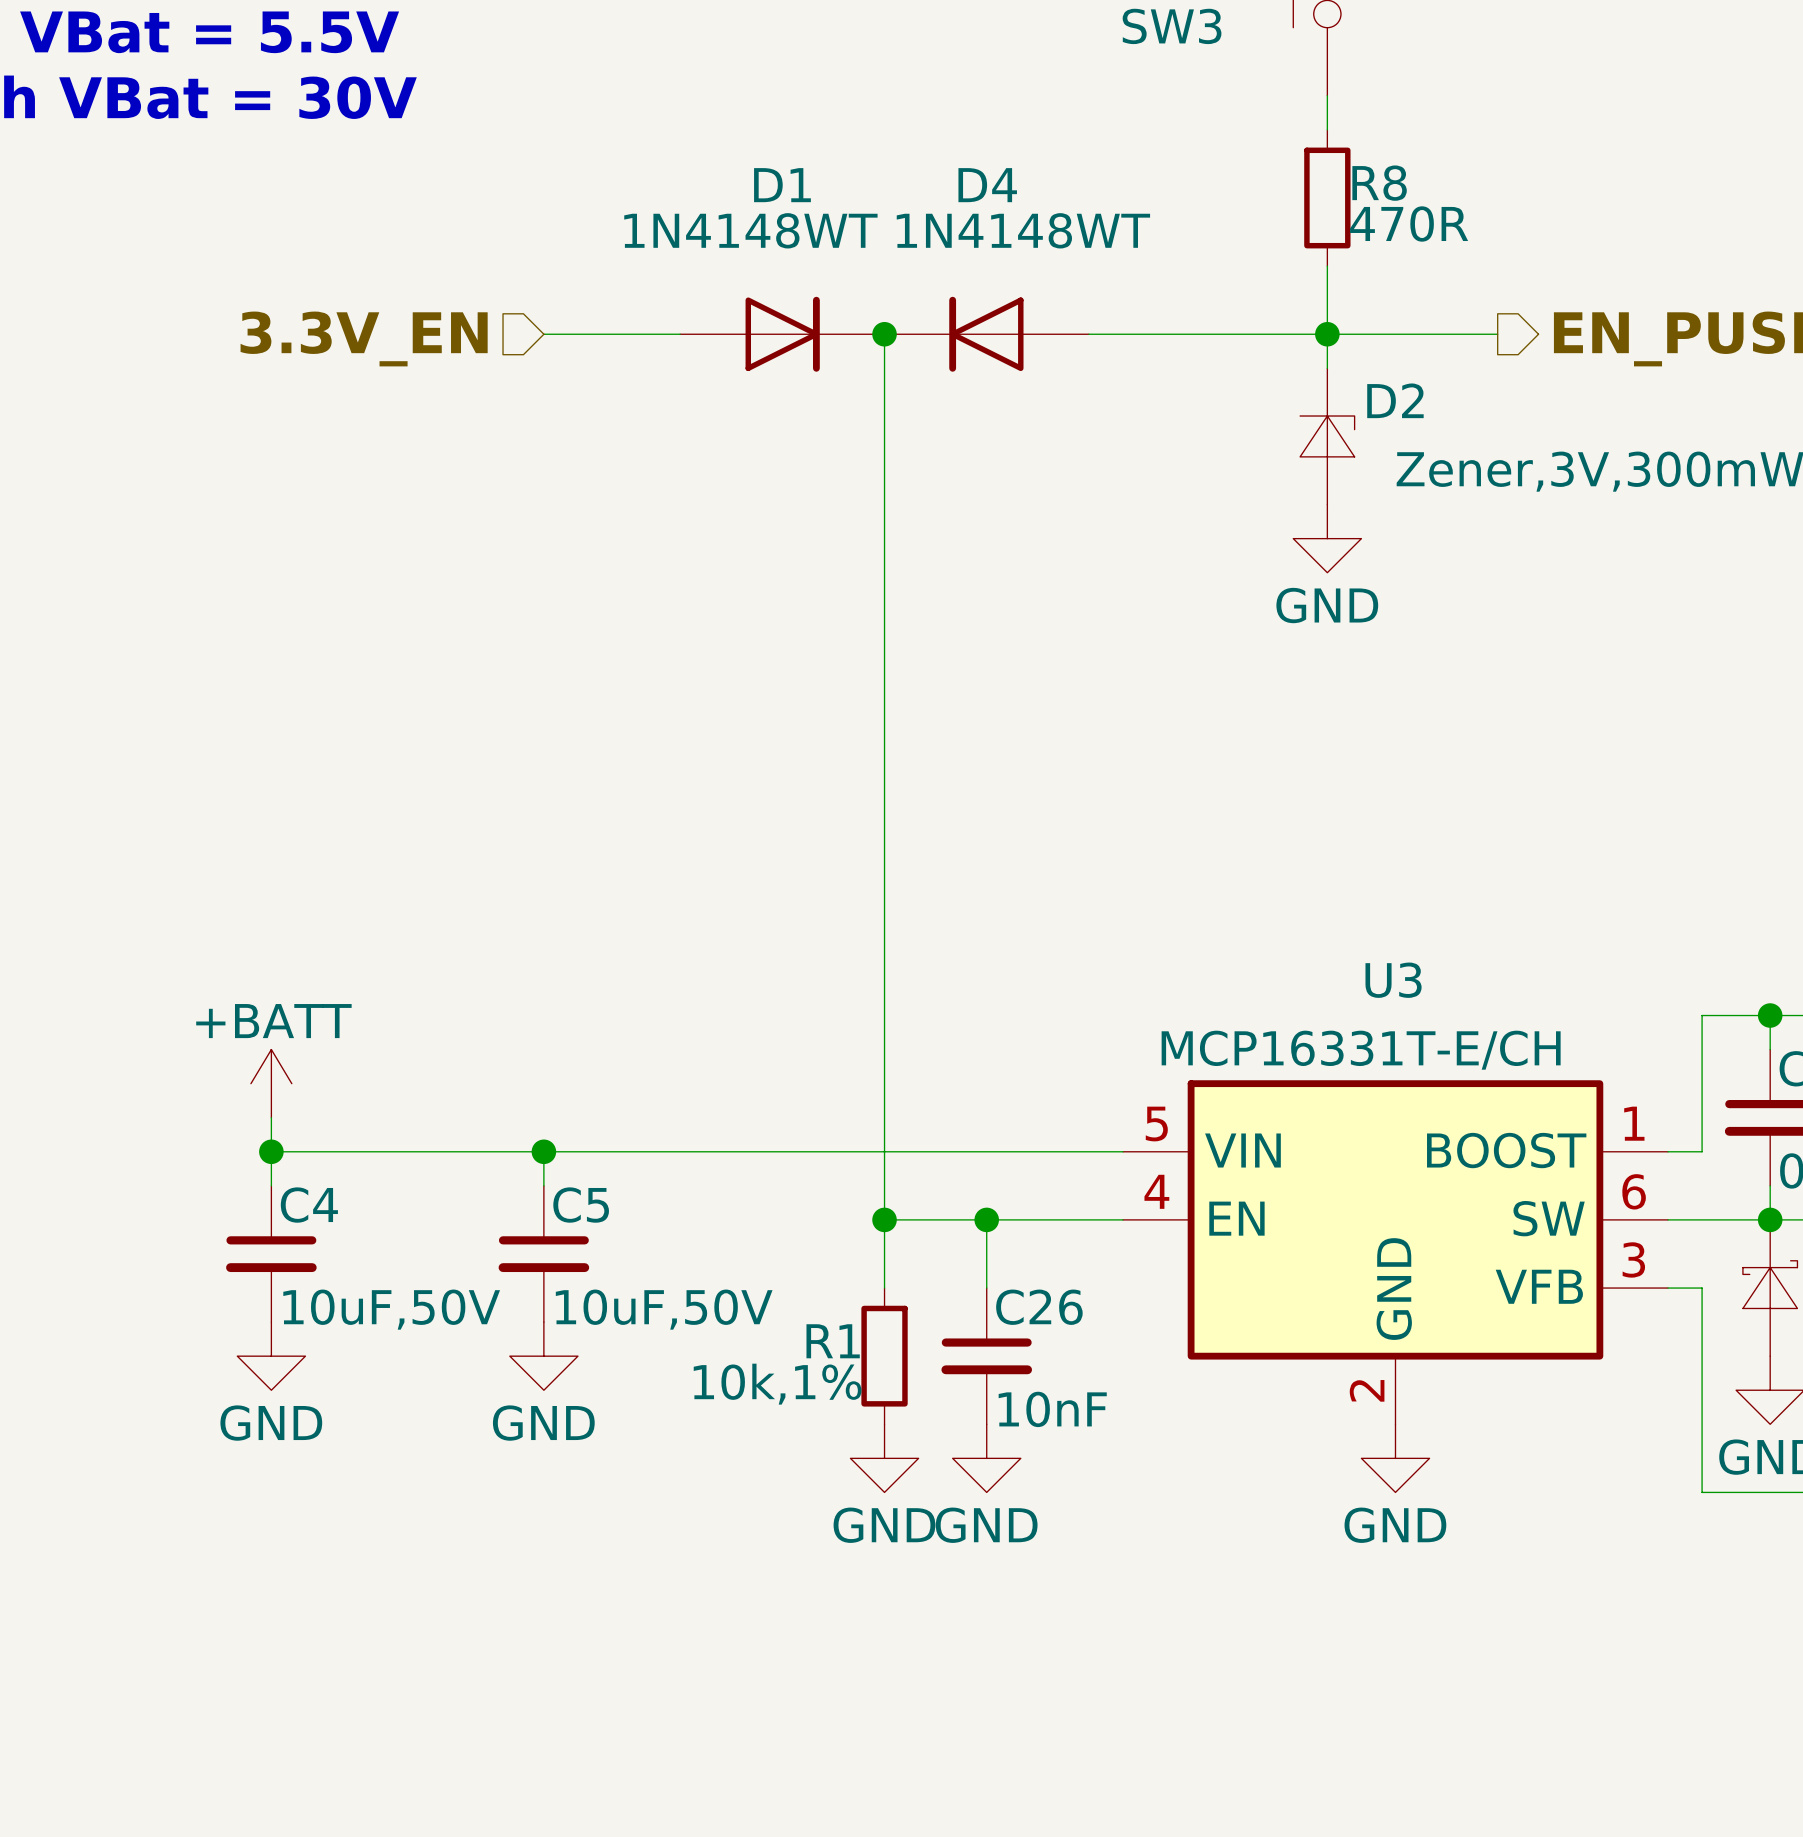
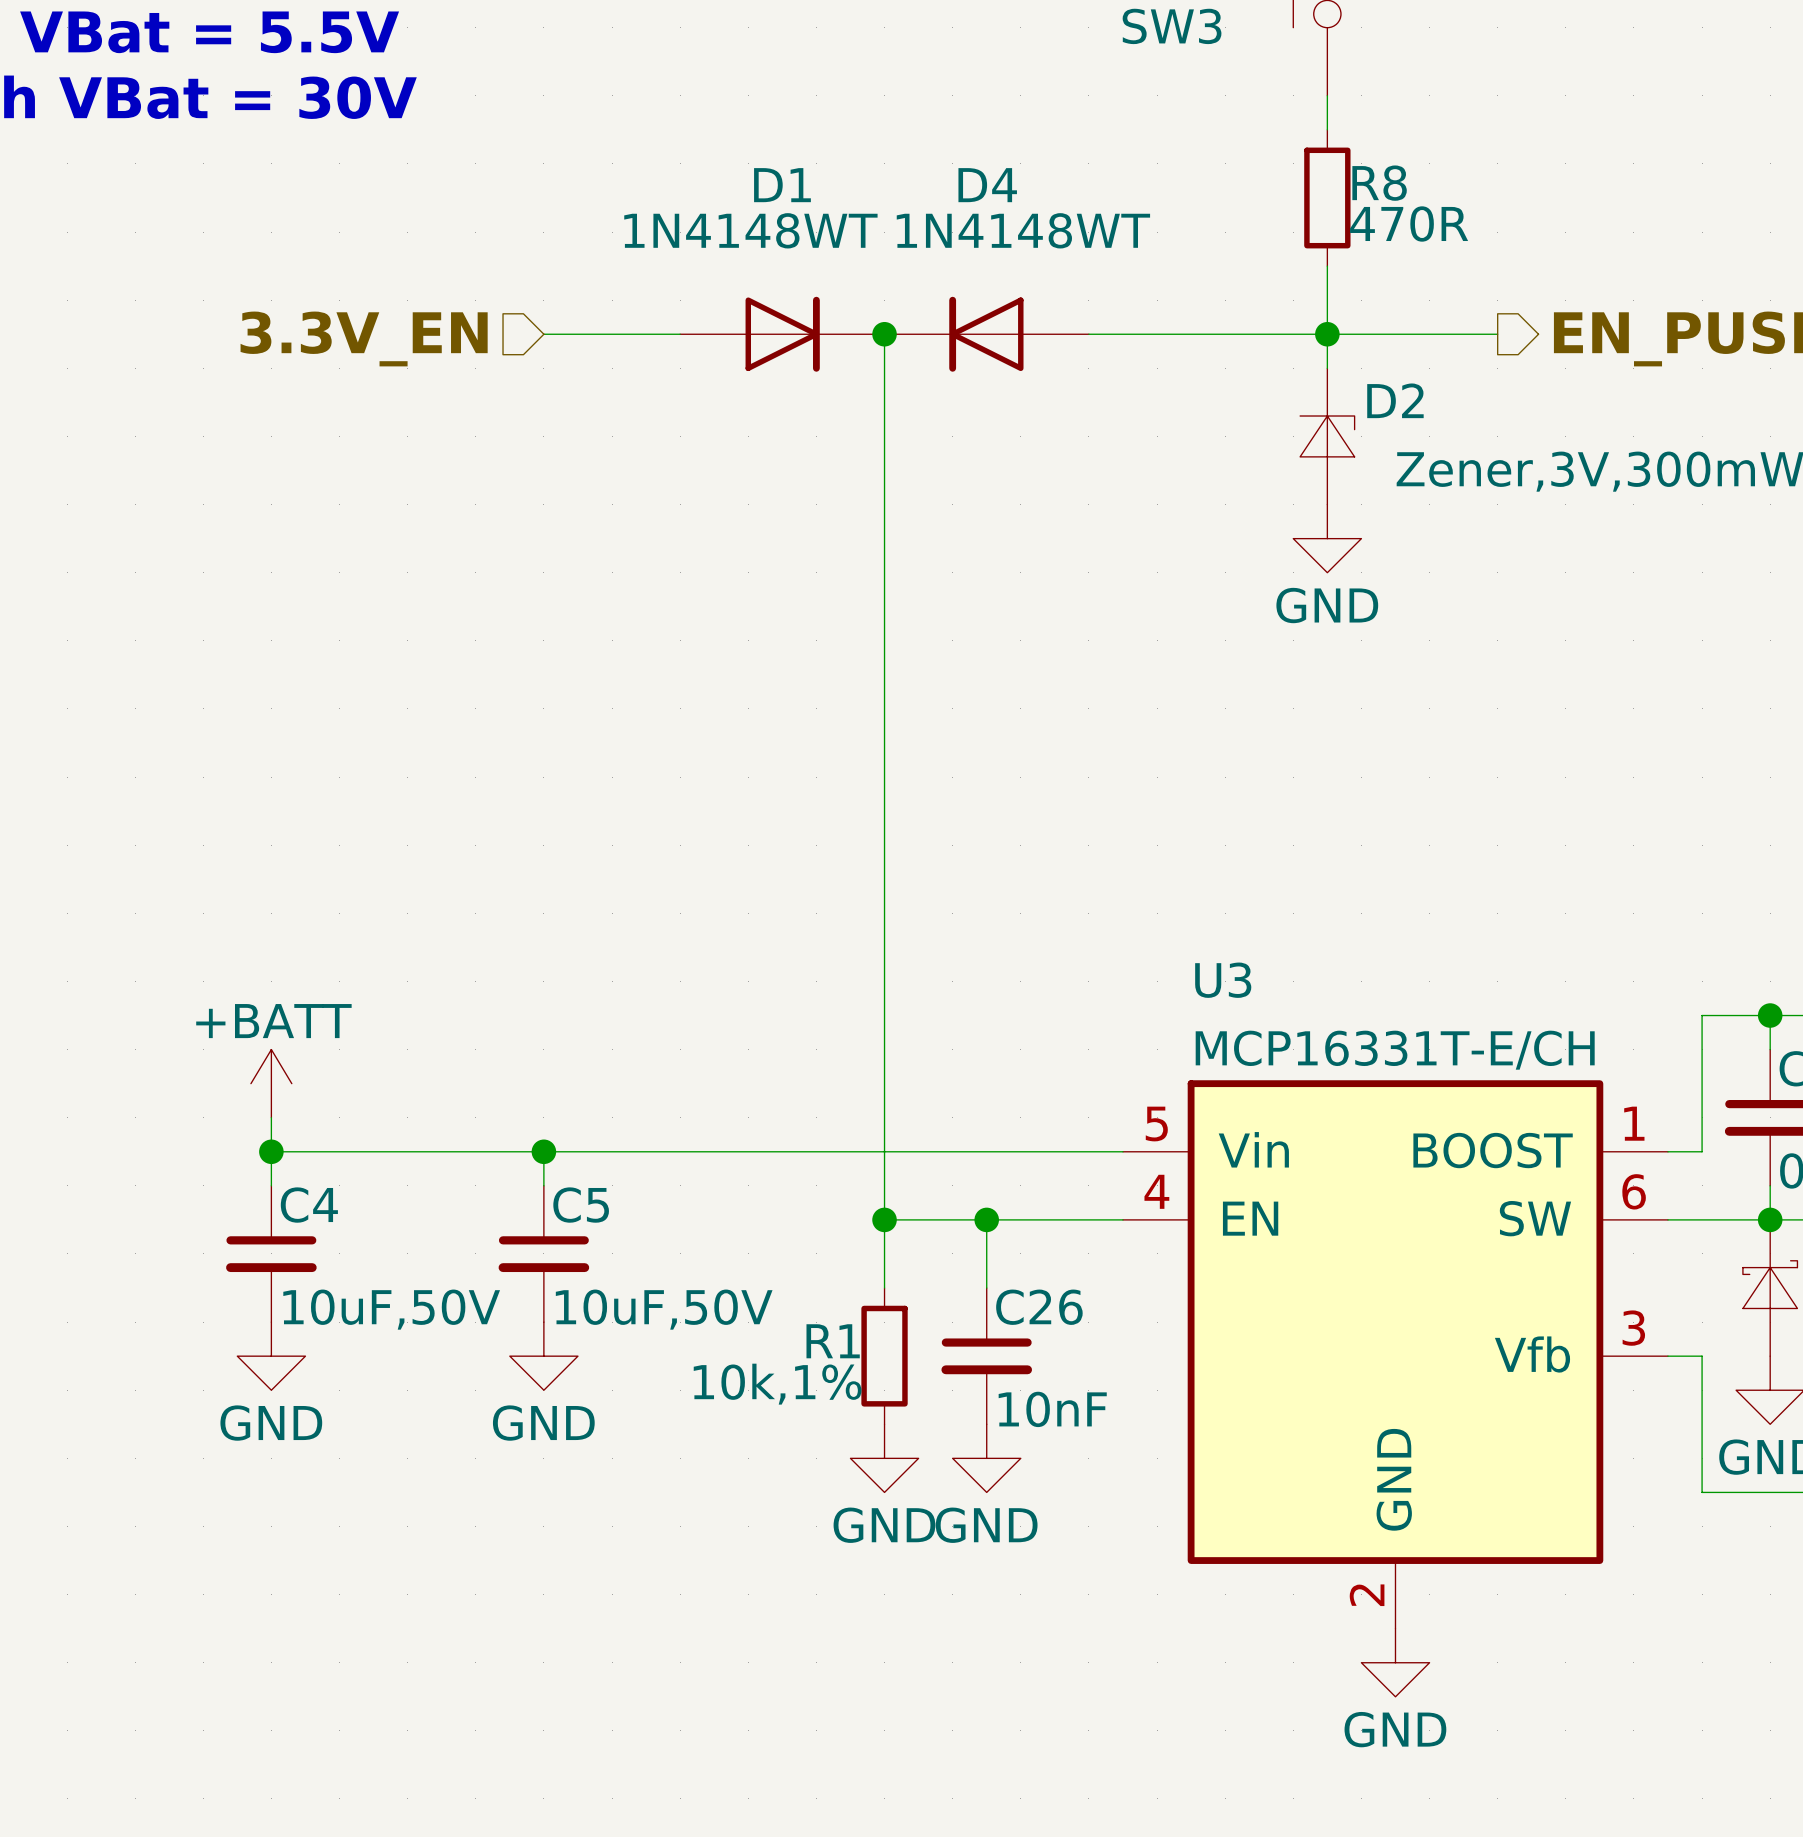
U3 name position: U3 (1393, 980) -> U3 (1223, 980)
U3 value position: MCP16331T-E/CH (1361, 1050) -> MCP16331T-E/CH (1395, 1050)
U3 symbol: [1122, 1080, 1668, 1425] -> [1122, 1080, 1668, 1629]
wire: (1667, 1288) (1702, 1288) (1702, 1356) -> (1667, 1356) (1702, 1356)
power symbol position: GND (1395, 1458) -> GND (1395, 1662)

